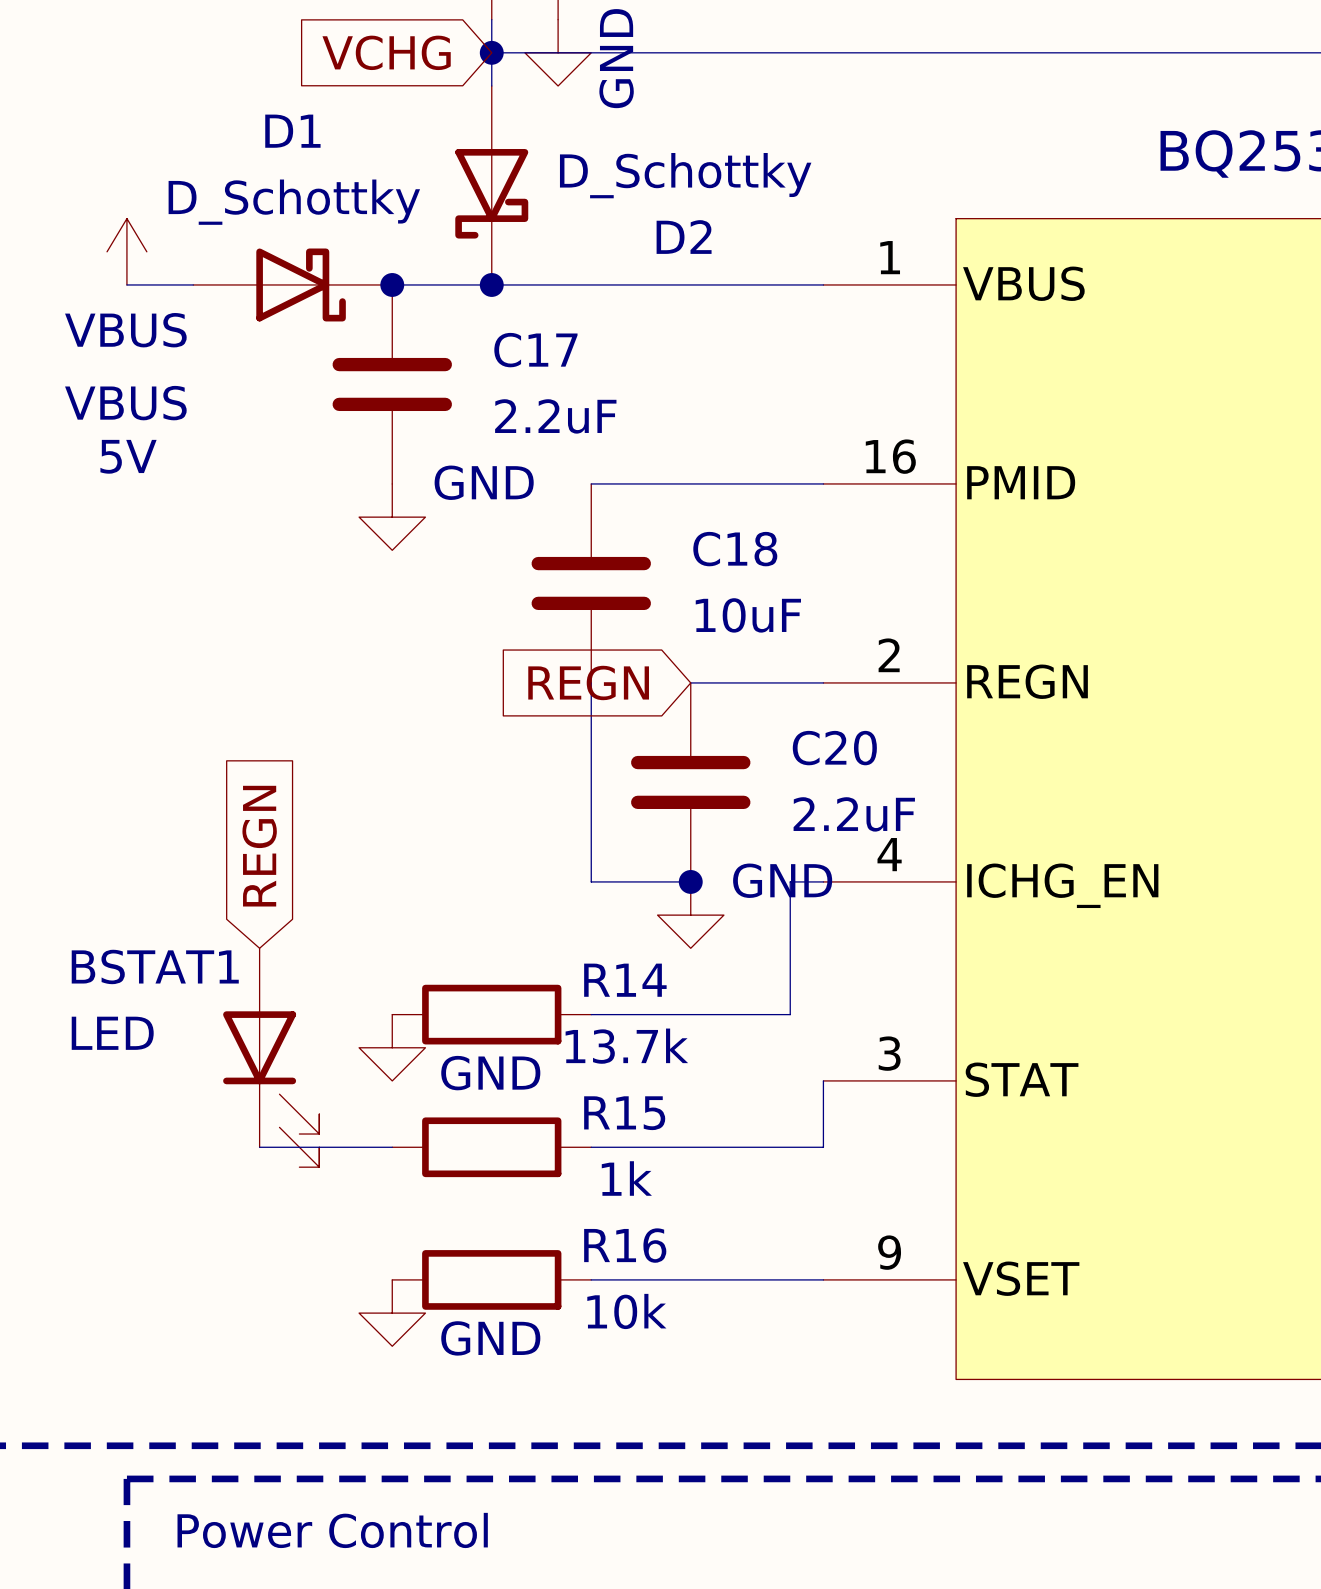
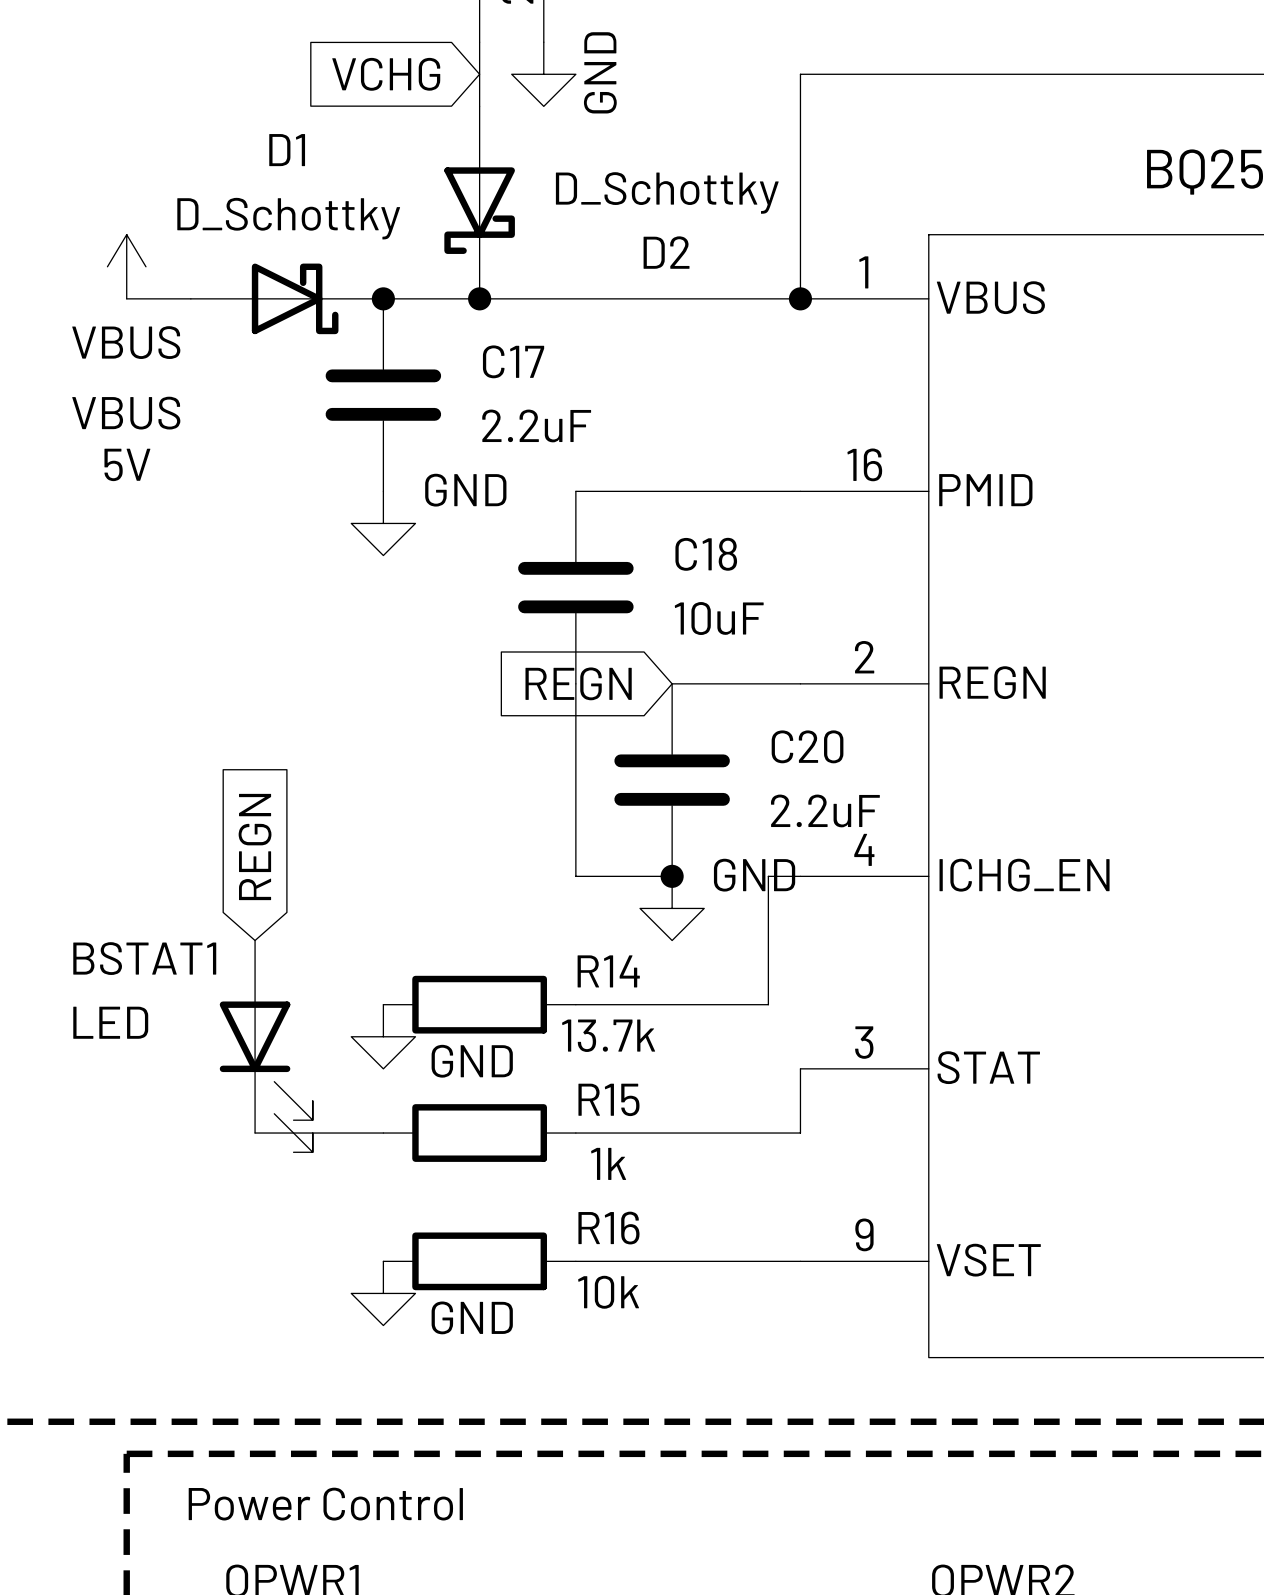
wire: (491, 52) (823, 52) -> (800, 298) (800, 74)
junction: (491, 52) -> none
junction: none -> (800, 298)

